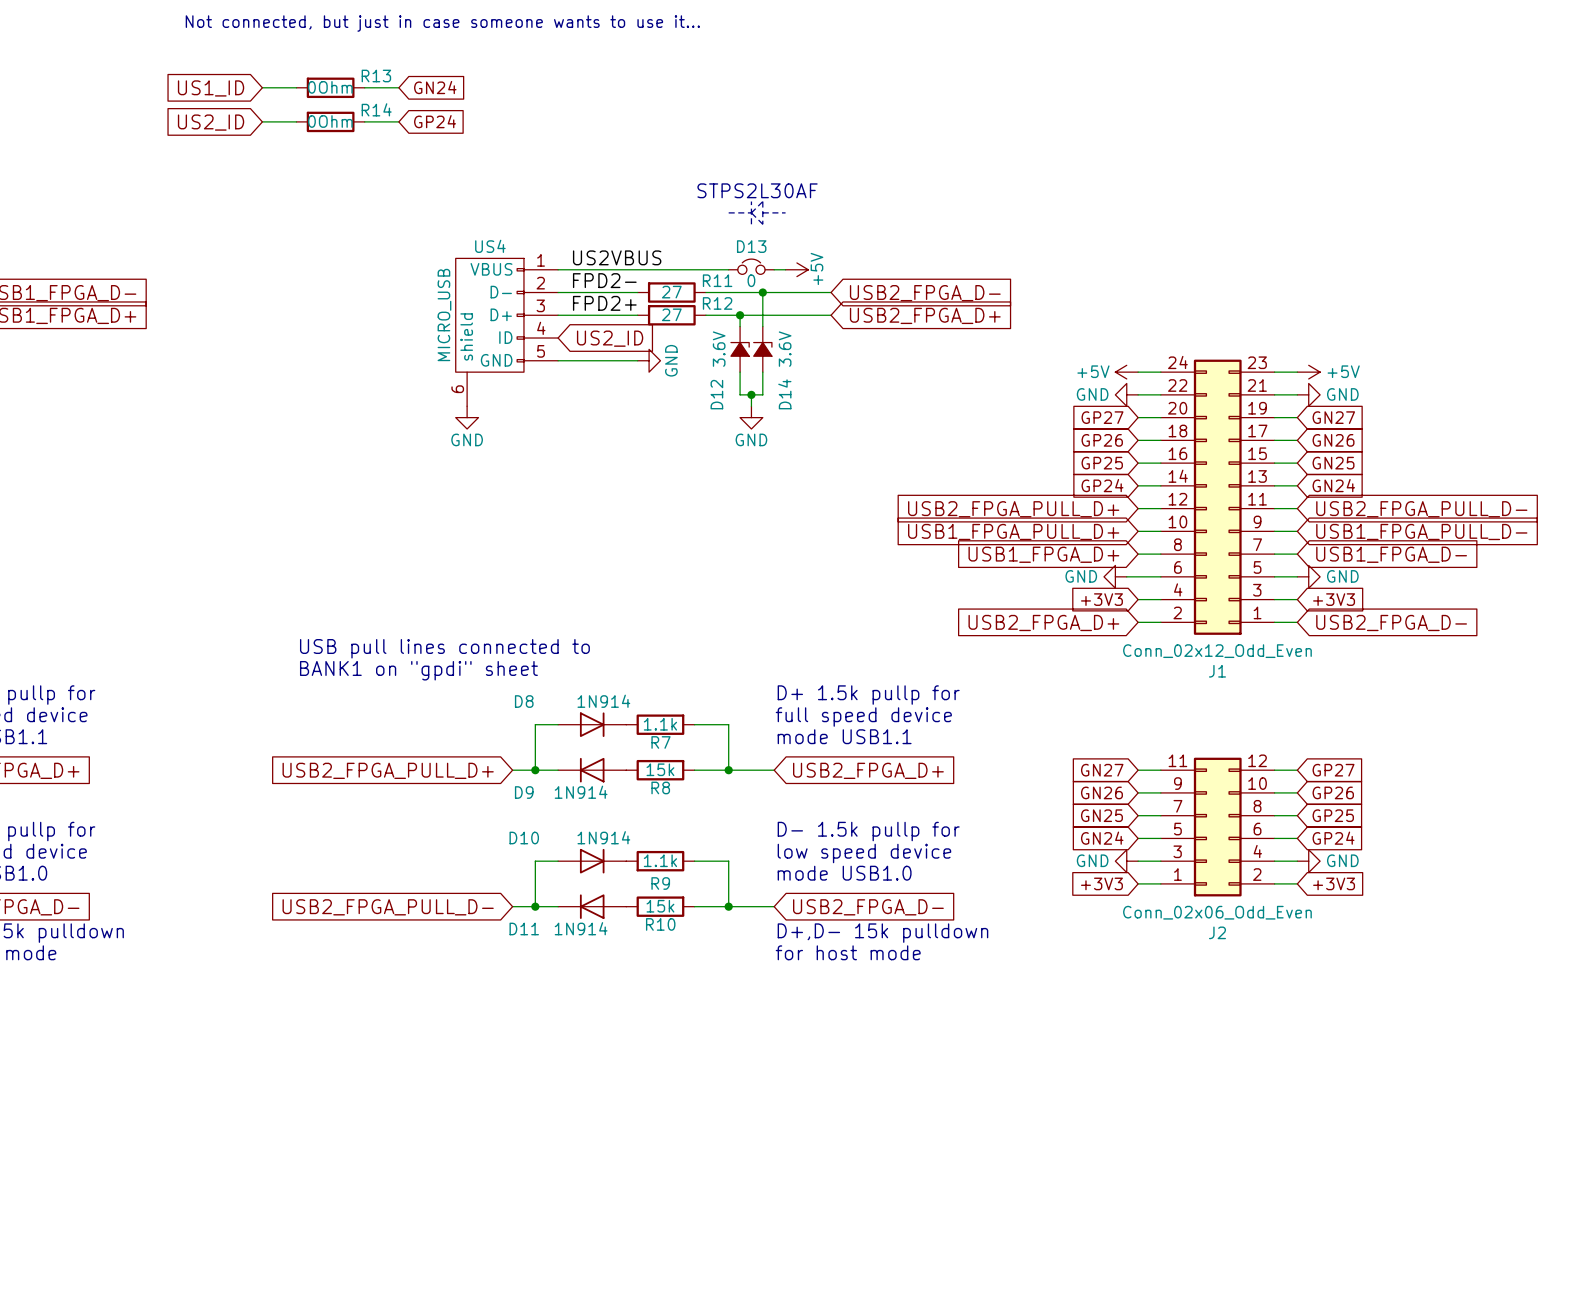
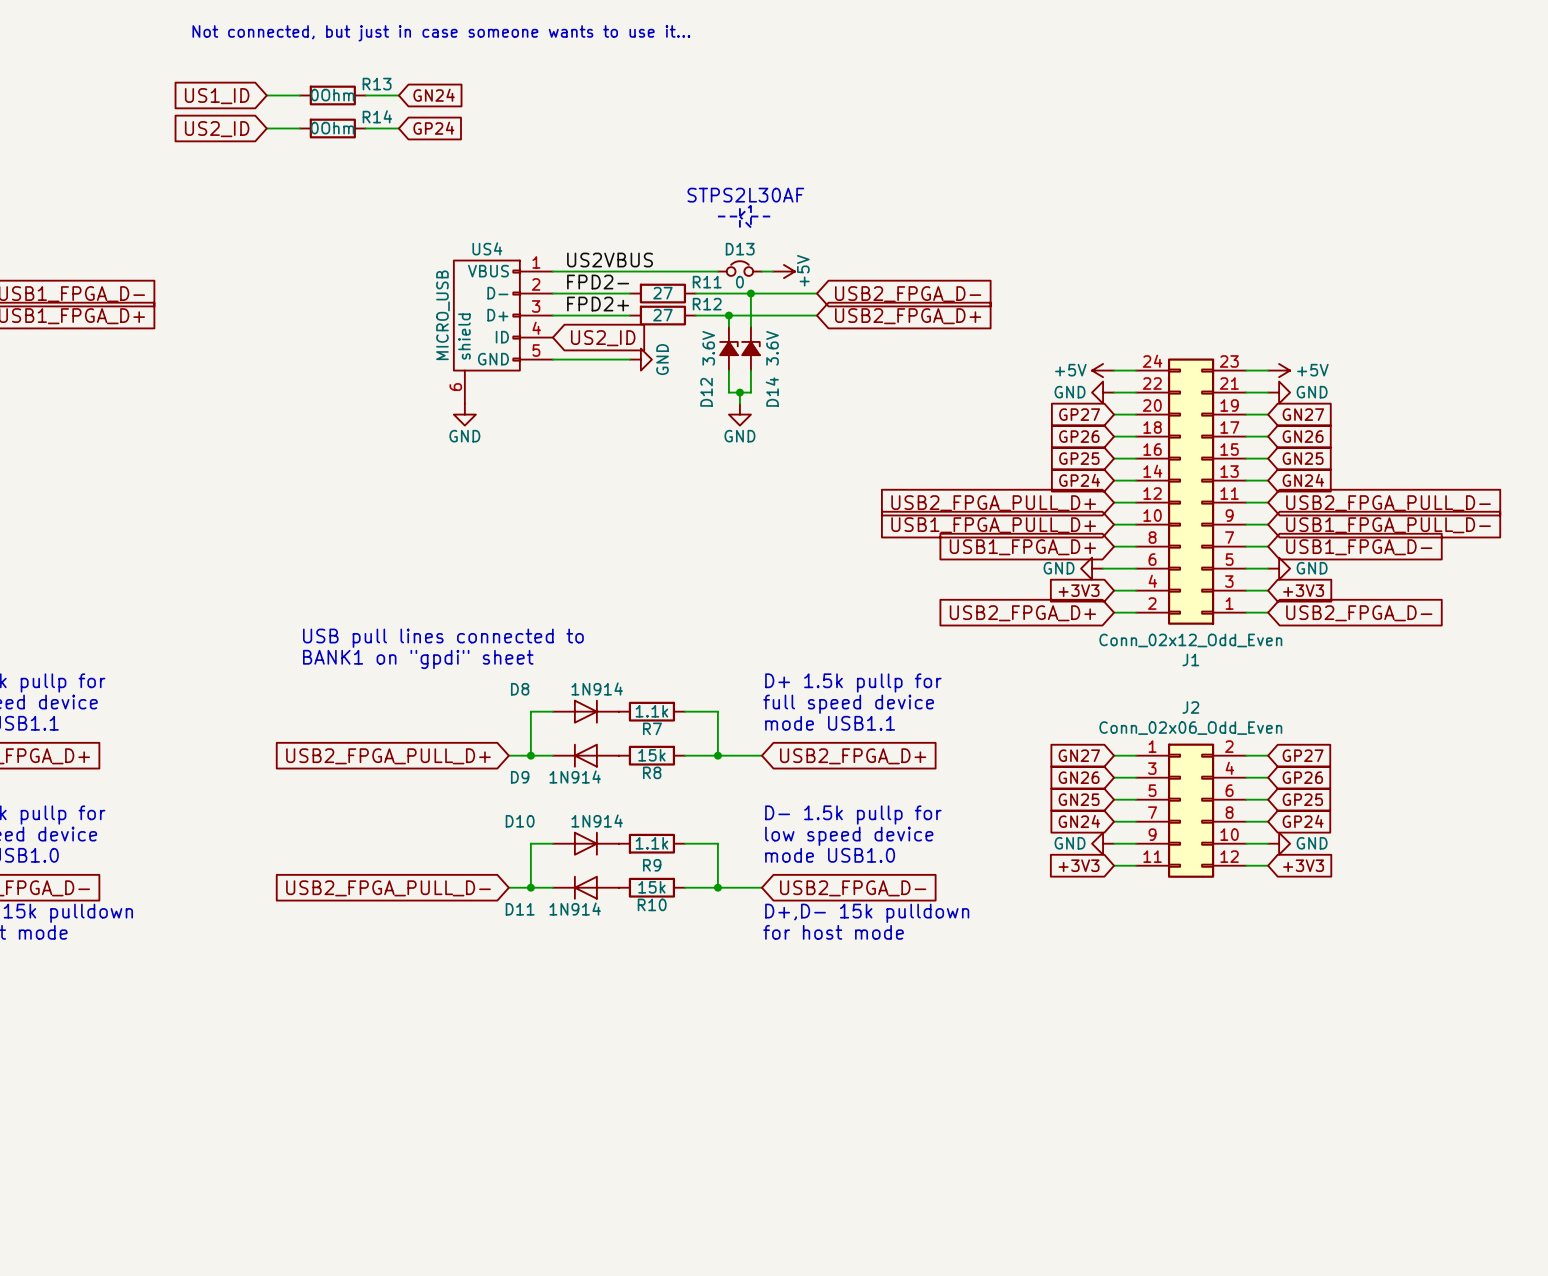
J2 flip: as is (1217, 827) -> up-down (1191, 810)

